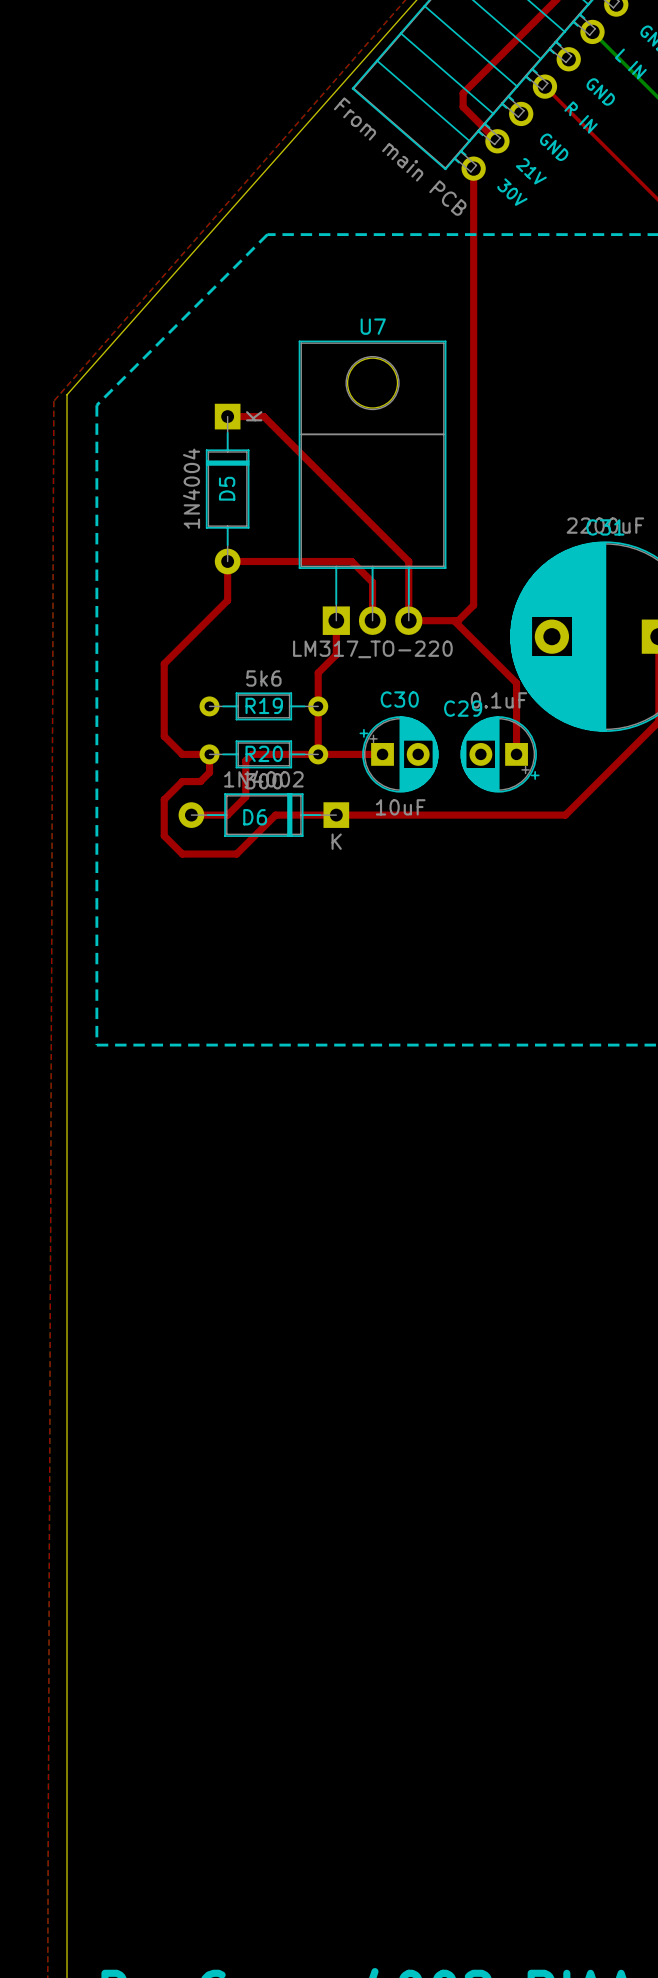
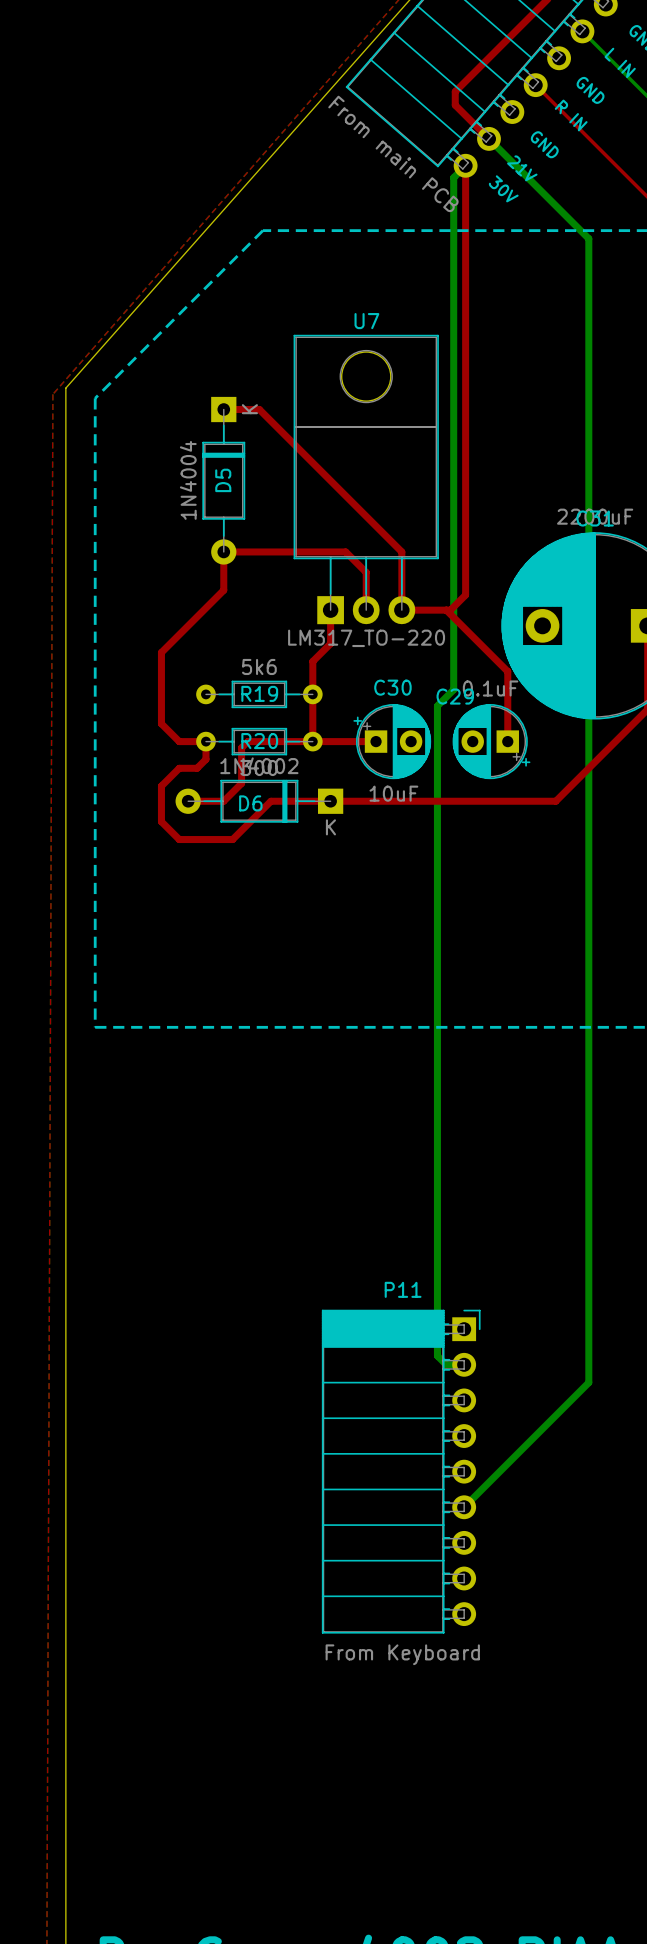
bottom track: none -> (488, 138) (588, 238) (588, 1382) (464, 1507)
bottom track: none -> (465, 165) (453, 177) (453, 689) (437, 705) (437, 1355) (446, 1364) (464, 1364)
P11: none -> From Keyboard (401, 1471)

